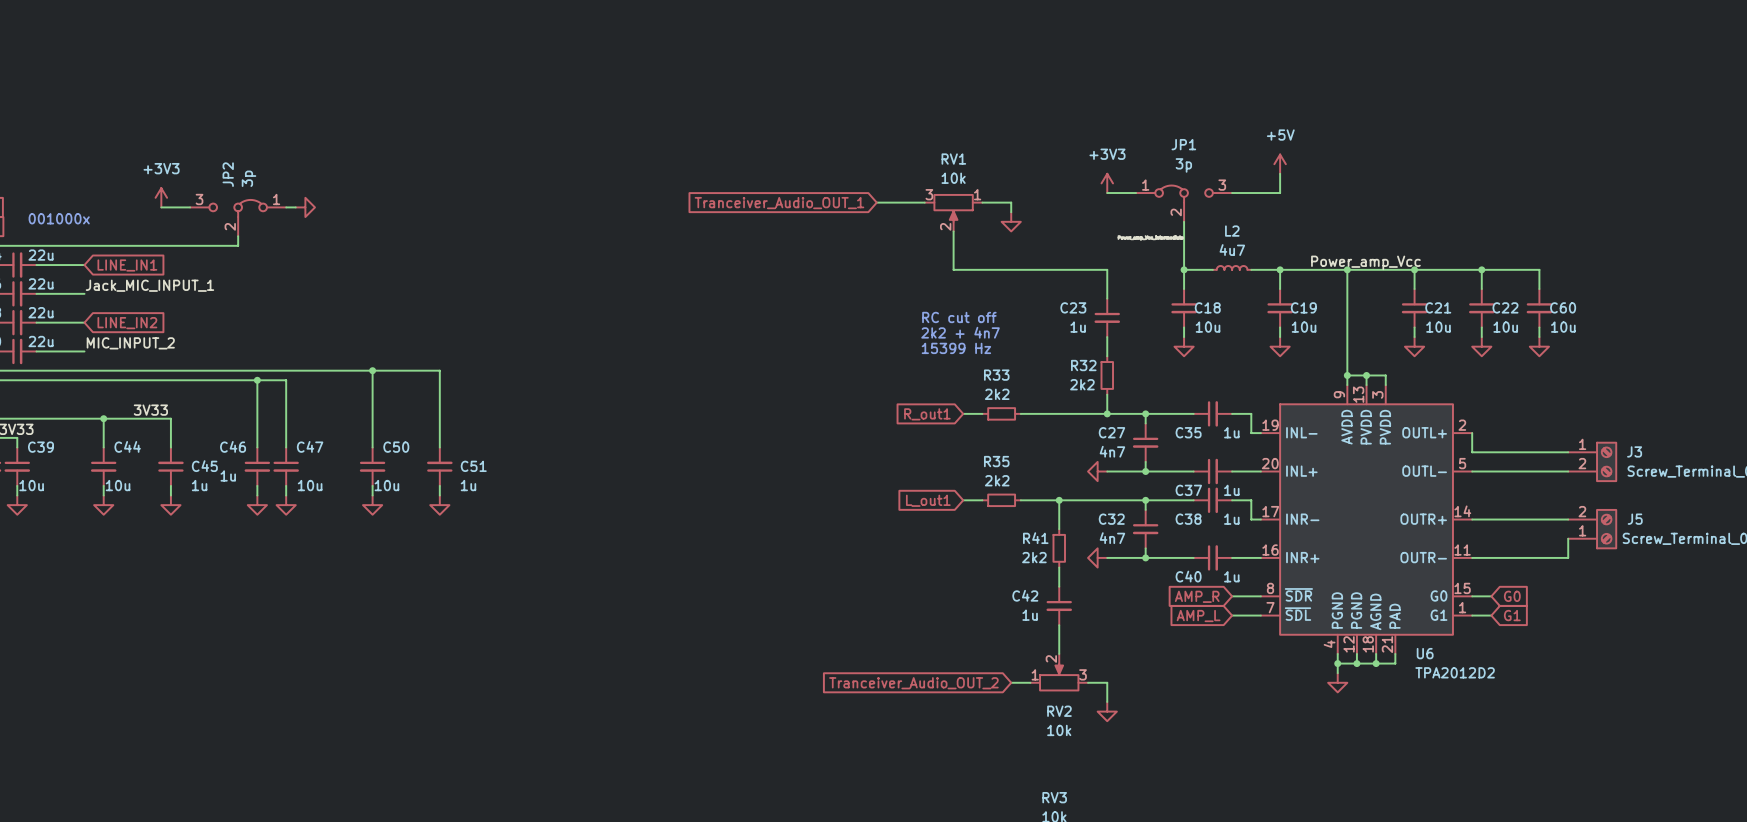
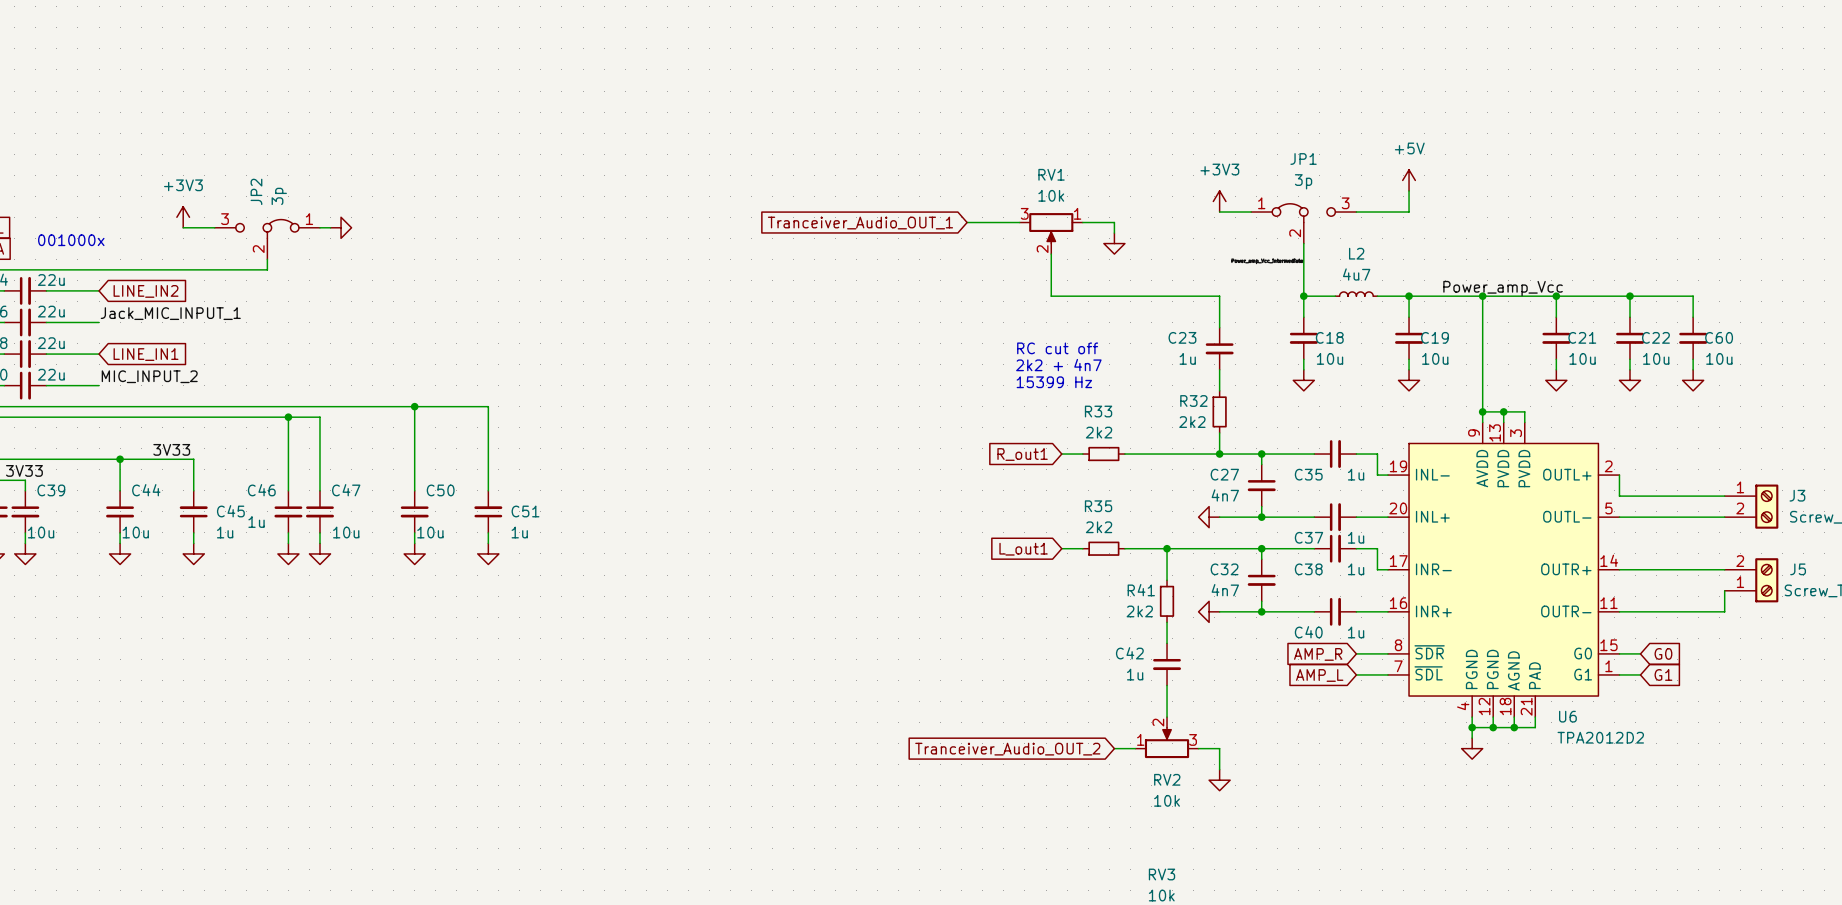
global label: LINE_IN1 (127, 265) -> LINE_IN2 (146, 291)
global label: LINE_IN2 (127, 323) -> LINE_IN1 (146, 354)

